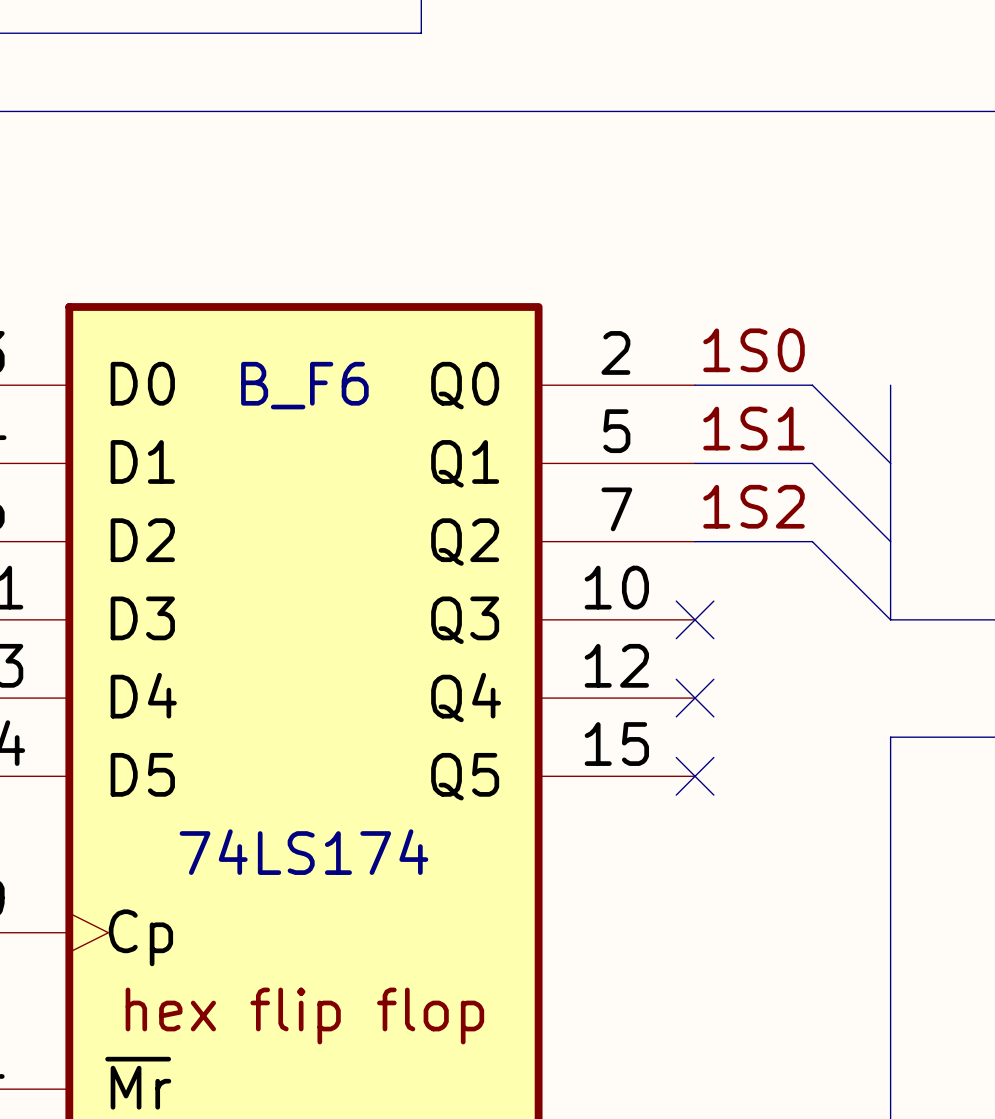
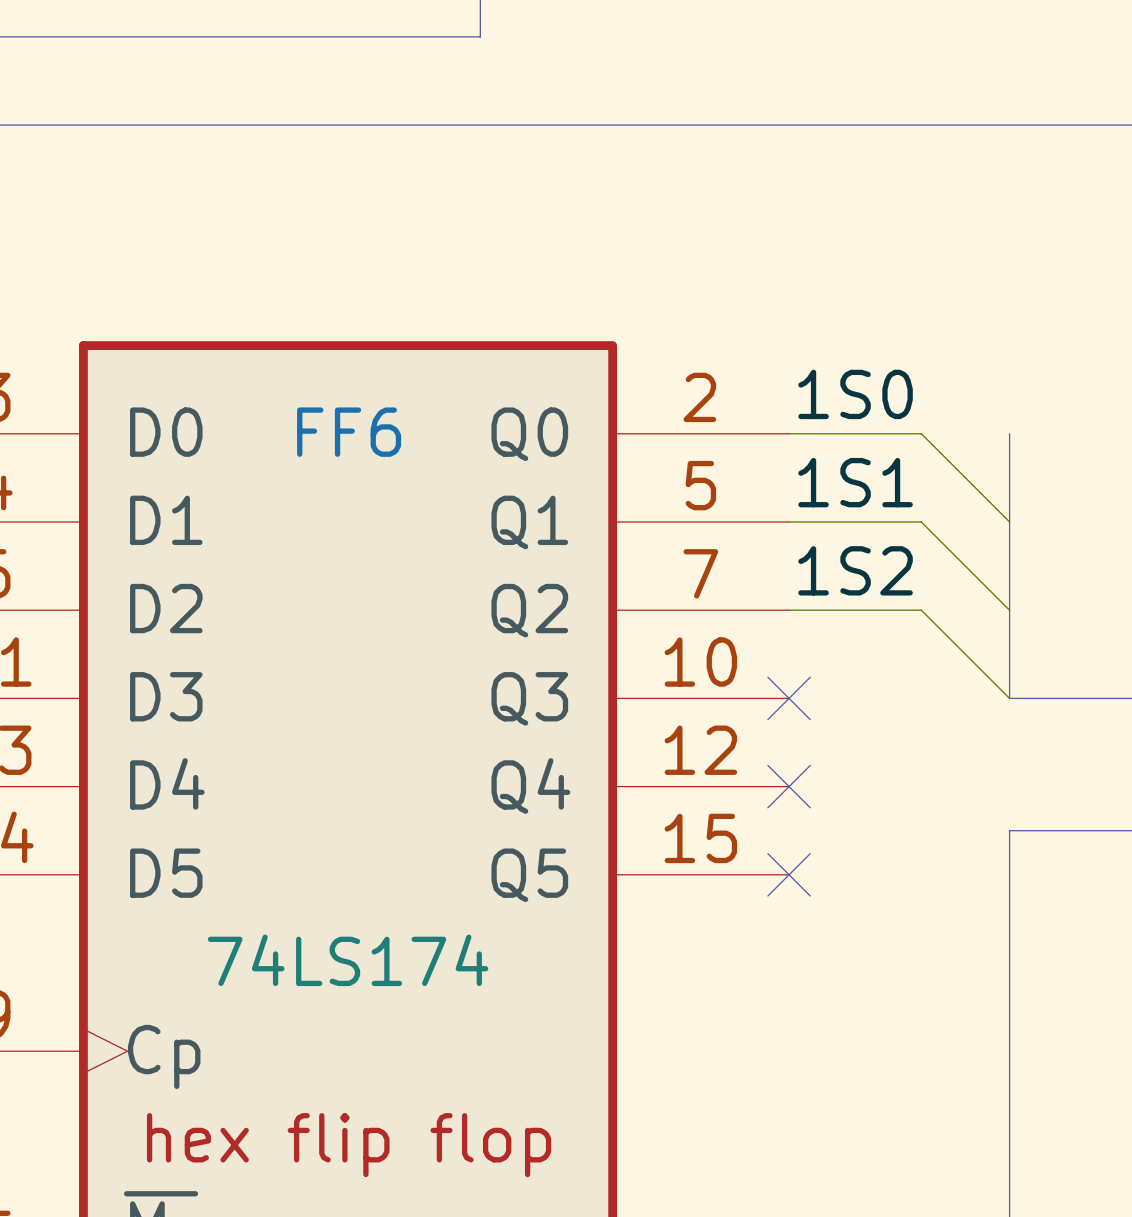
B_F6 name: B_F6 (304, 385) -> FF6 (349, 432)

